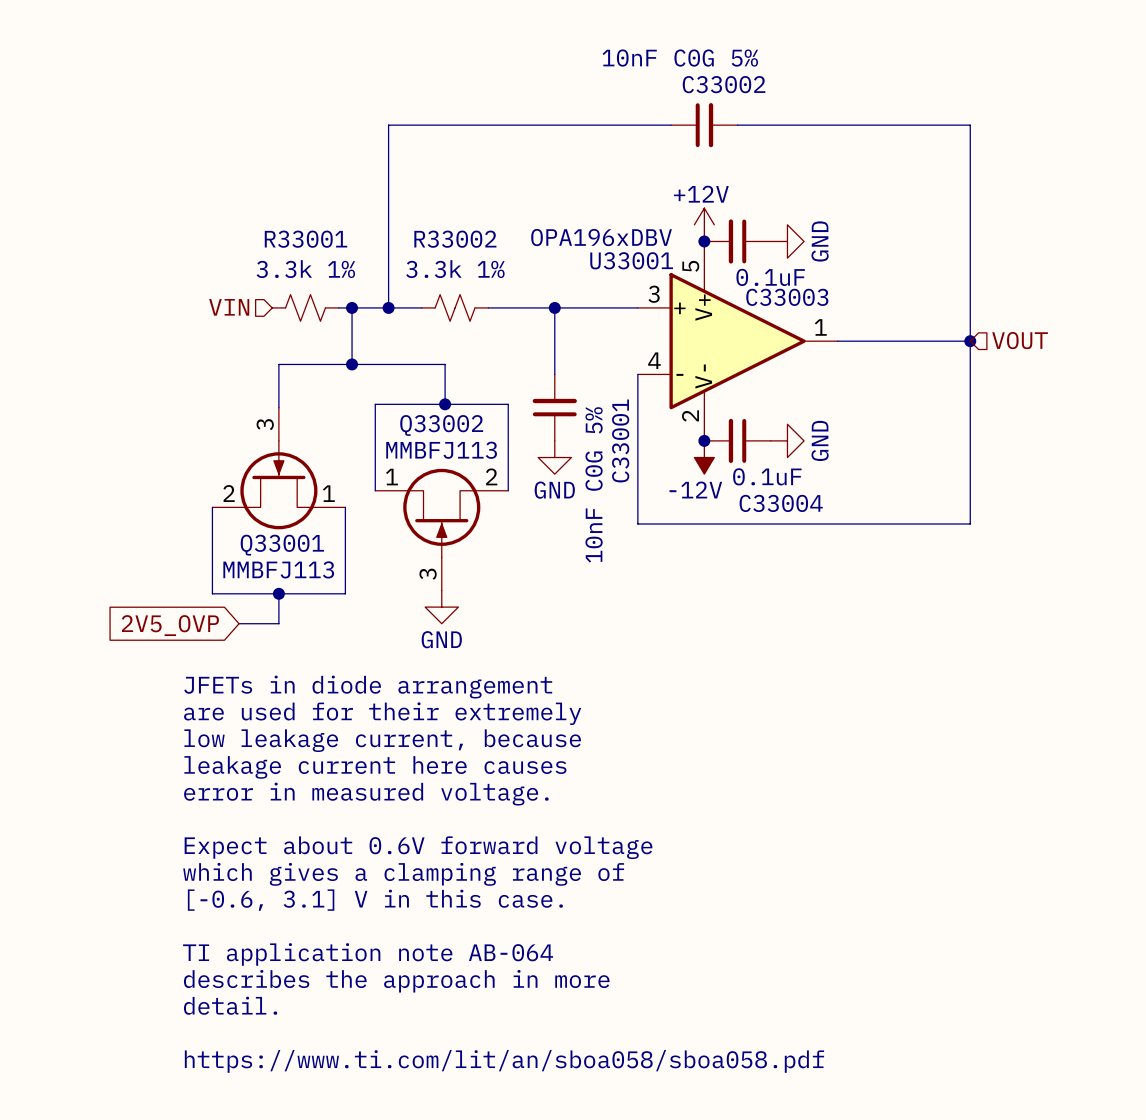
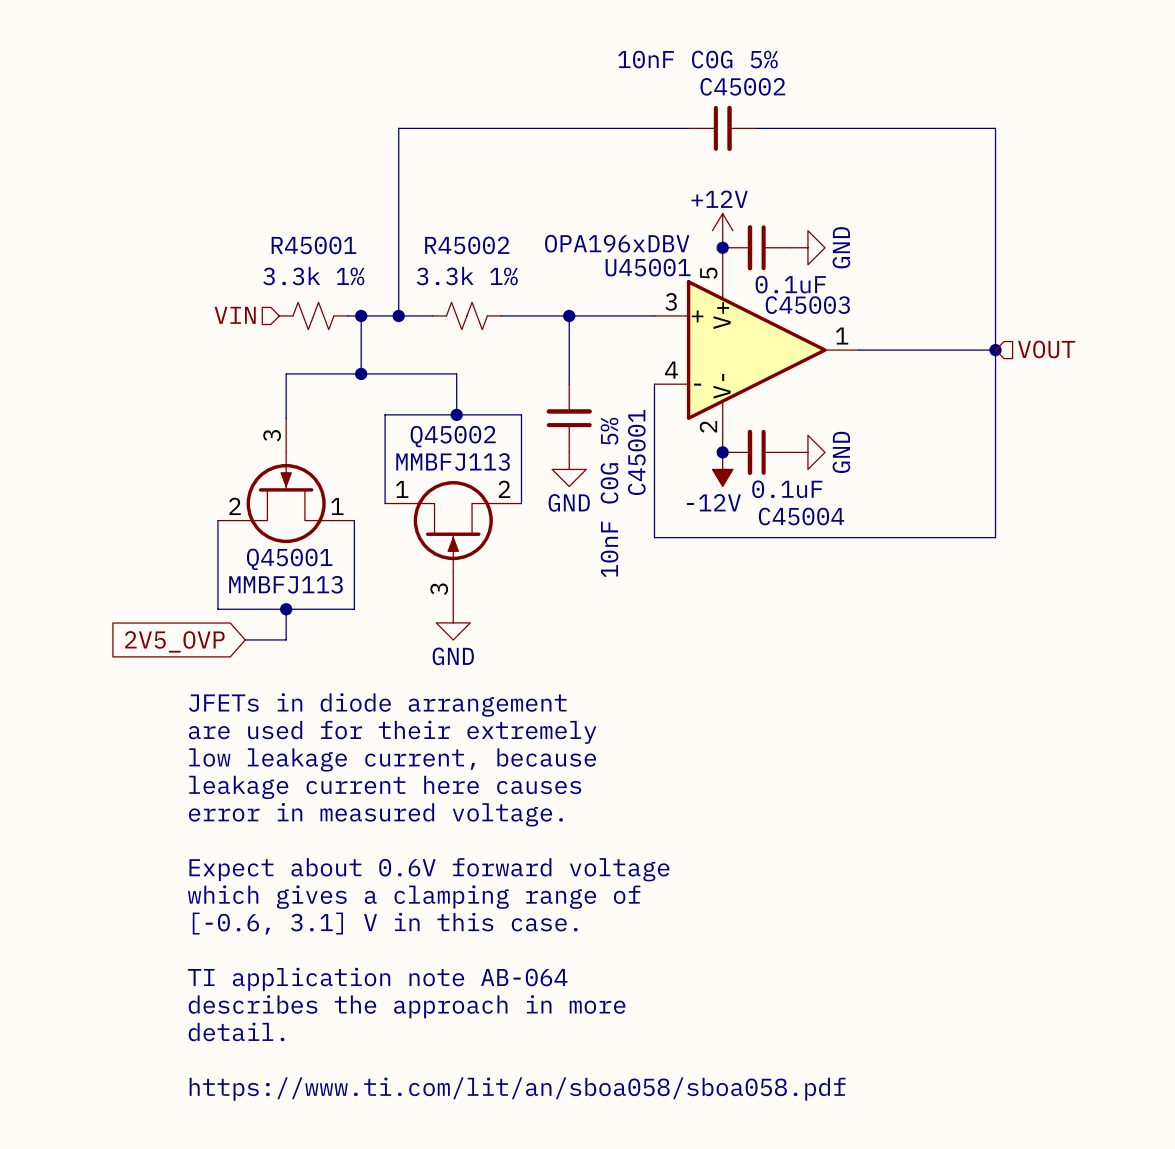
C33002 name: C33002 (724, 84) -> C45002 (742, 86)
R33001 name: R33001 (306, 239) -> R45001 (313, 245)
R33002 name: R33002 (455, 239) -> R45002 (467, 245)
U33001 name: U33001 (631, 260) -> U45001 (648, 267)
C33003 name: C33003 (787, 297) -> C45003 (807, 305)
Q33002 name: Q33002 (441, 425) -> Q45002 (453, 436)
C33001 name: C33001 (620, 440) -> C45001 (636, 452)
C33004 name: C33004 (781, 503) -> C45004 (801, 516)
Q33001 name: Q33001 (282, 545) -> Q45001 (289, 559)

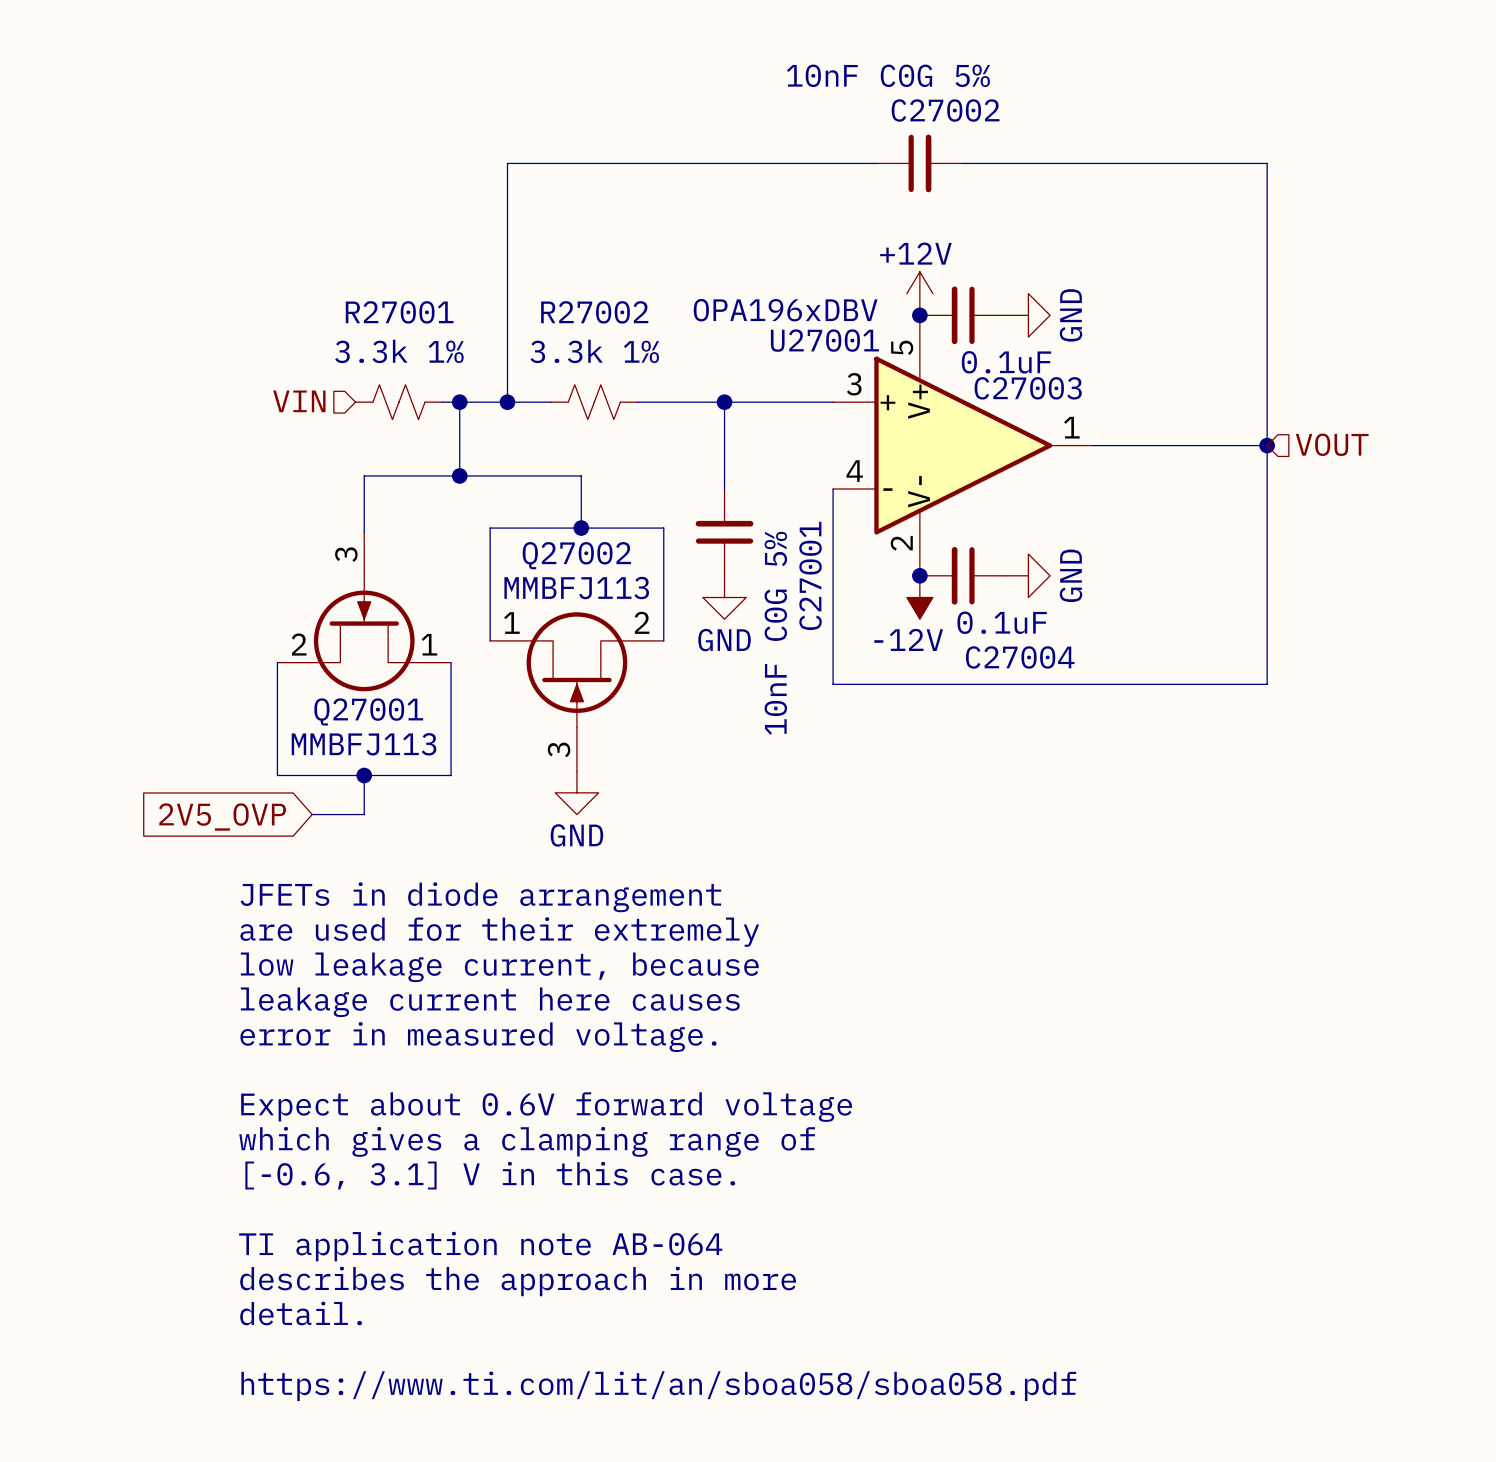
C45002 name: C45002 (742, 86) -> C27002 (945, 110)
R45001 name: R45001 (313, 245) -> R27001 (399, 312)
R45002 name: R45002 (467, 245) -> R27002 (594, 312)
U45001 name: U45001 (648, 267) -> U27001 (824, 340)
C45003 name: C45003 (807, 305) -> C27003 (1028, 388)
Q45002 name: Q45002 (453, 436) -> Q27002 (576, 555)
C45001 name: C45001 (636, 452) -> C27001 (810, 575)
C45004 name: C45004 (801, 516) -> C27004 (1020, 657)
Q45001 name: Q45001 (289, 559) -> Q27001 (368, 711)

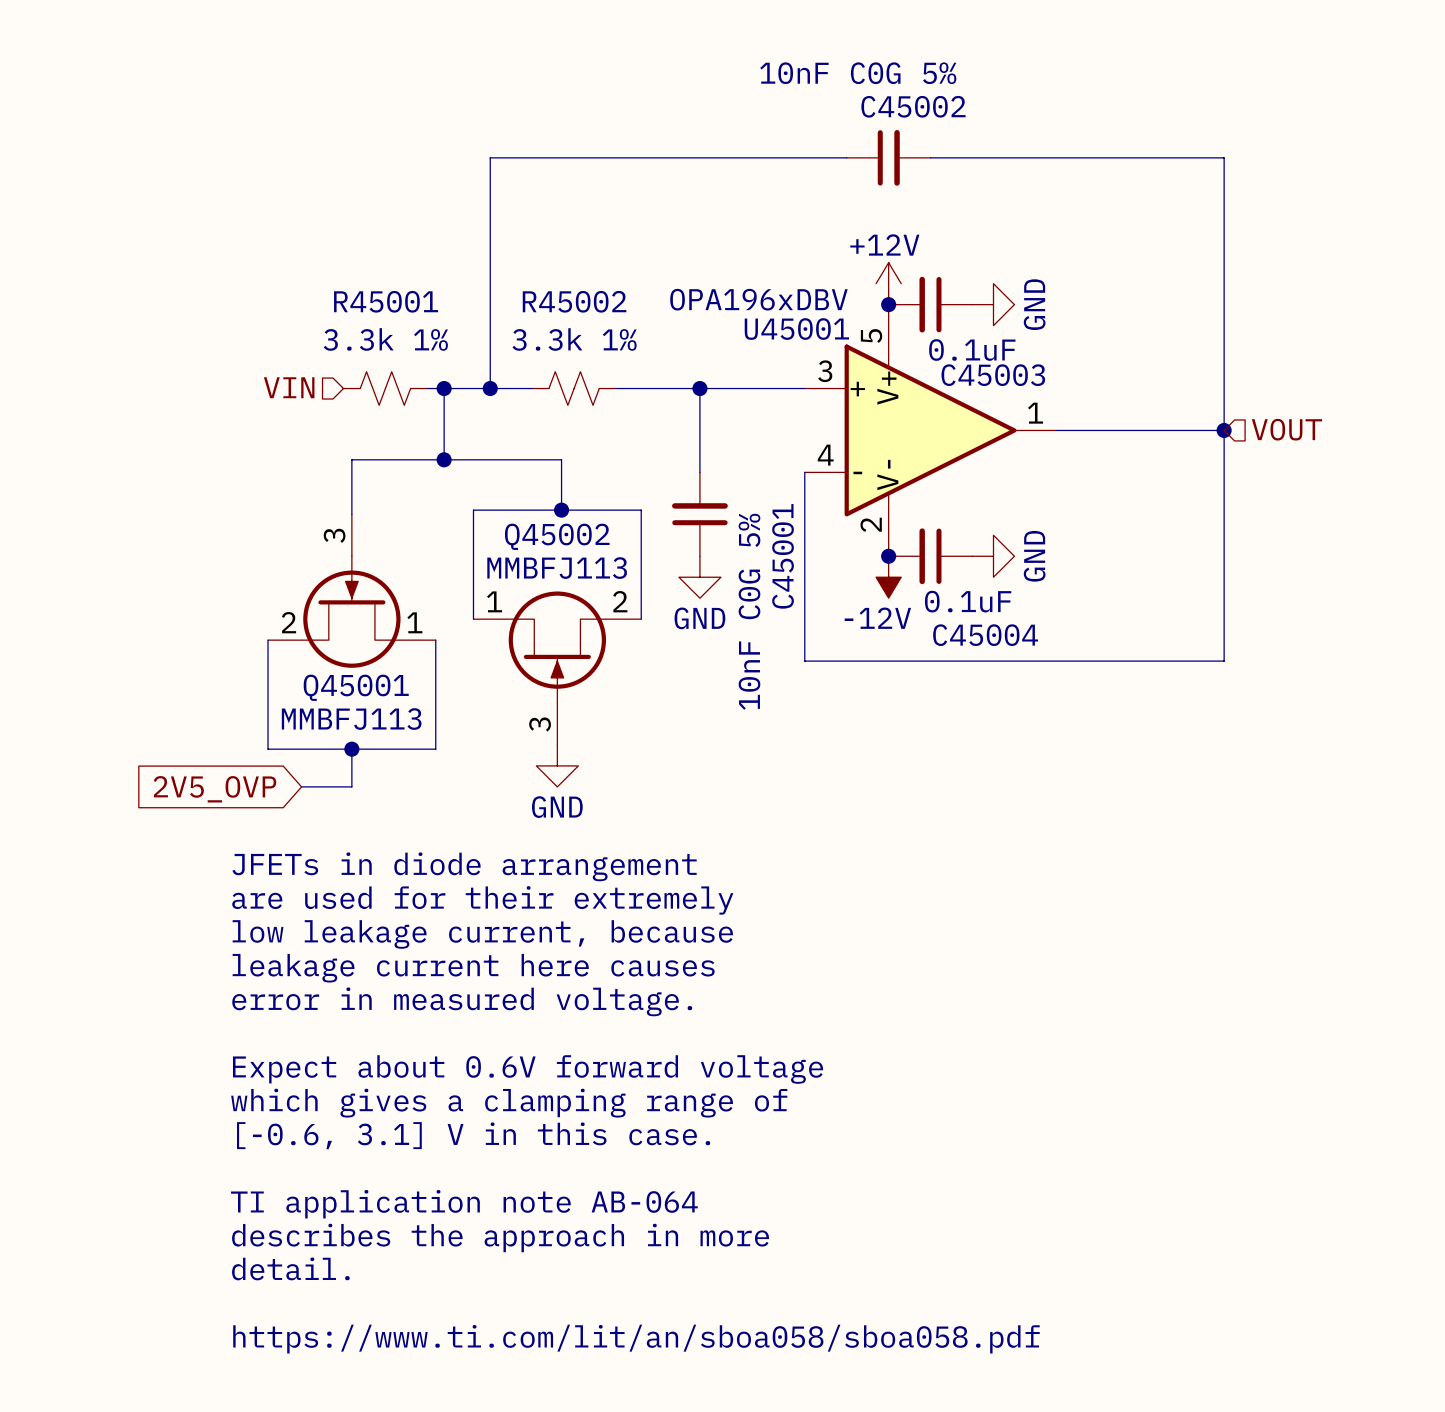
C27002 name: C27002 (945, 110) -> C45002 (913, 106)
R27001 name: R27001 (399, 312) -> R45001 (386, 301)
R27002 name: R27002 (594, 312) -> R45002 (574, 301)
U27001 name: U27001 (824, 340) -> U45001 (796, 329)
C27003 name: C27003 (1028, 388) -> C45003 (993, 375)
Q27002 name: Q27002 (576, 555) -> Q45002 (557, 536)
C27001 name: C27001 (810, 575) -> C45001 (783, 556)
C27004 name: C27004 (1020, 657) -> C45004 (985, 635)
Q27001 name: Q27001 (368, 711) -> Q45001 (356, 687)

